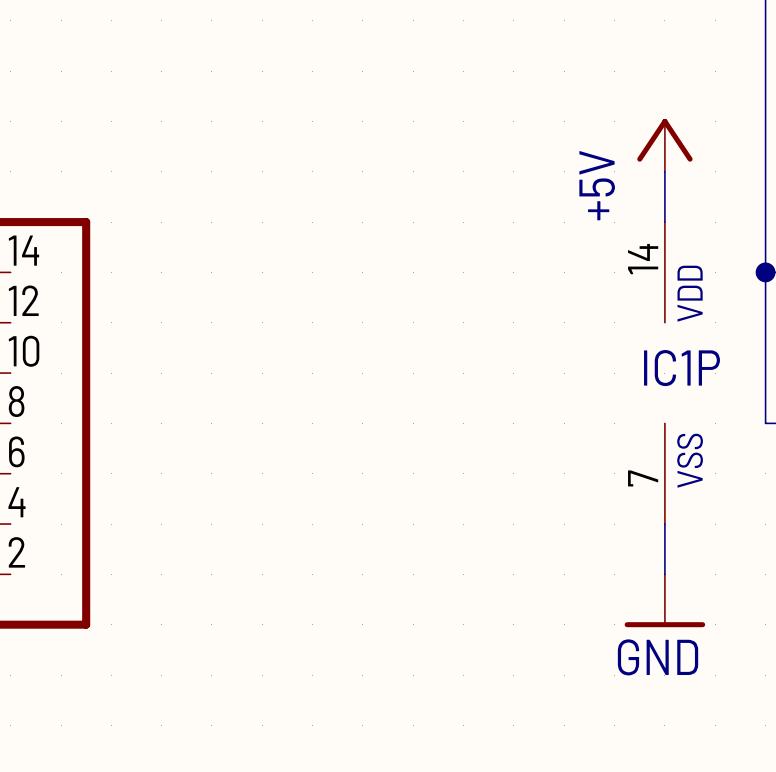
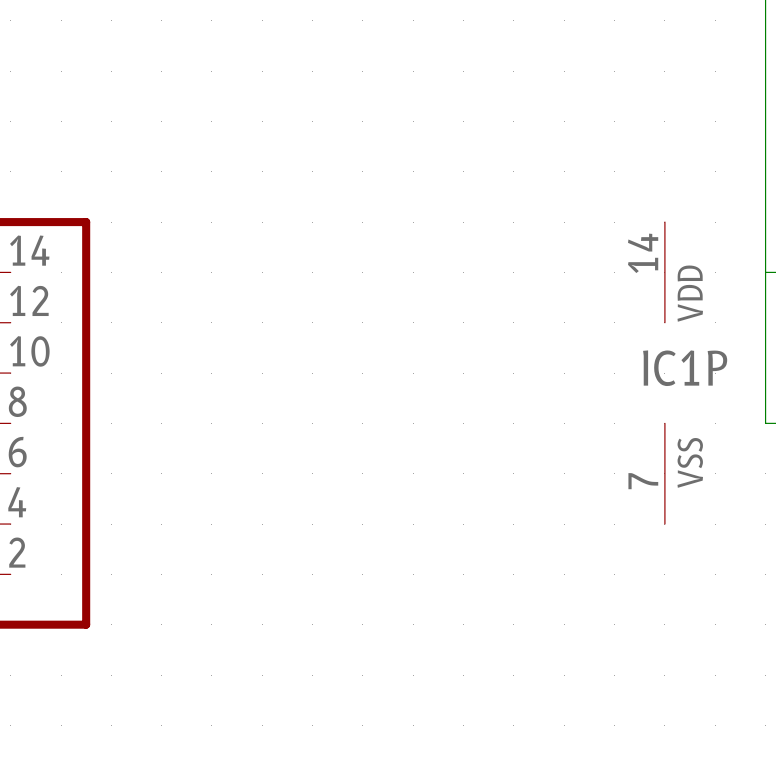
power symbol: +5V (664, 145) -> none
wire: (664, 171) (664, 222) -> none
junction: (765, 272) -> none
wire: (664, 524) (664, 574) -> none
power symbol: GND (664, 600) -> none

